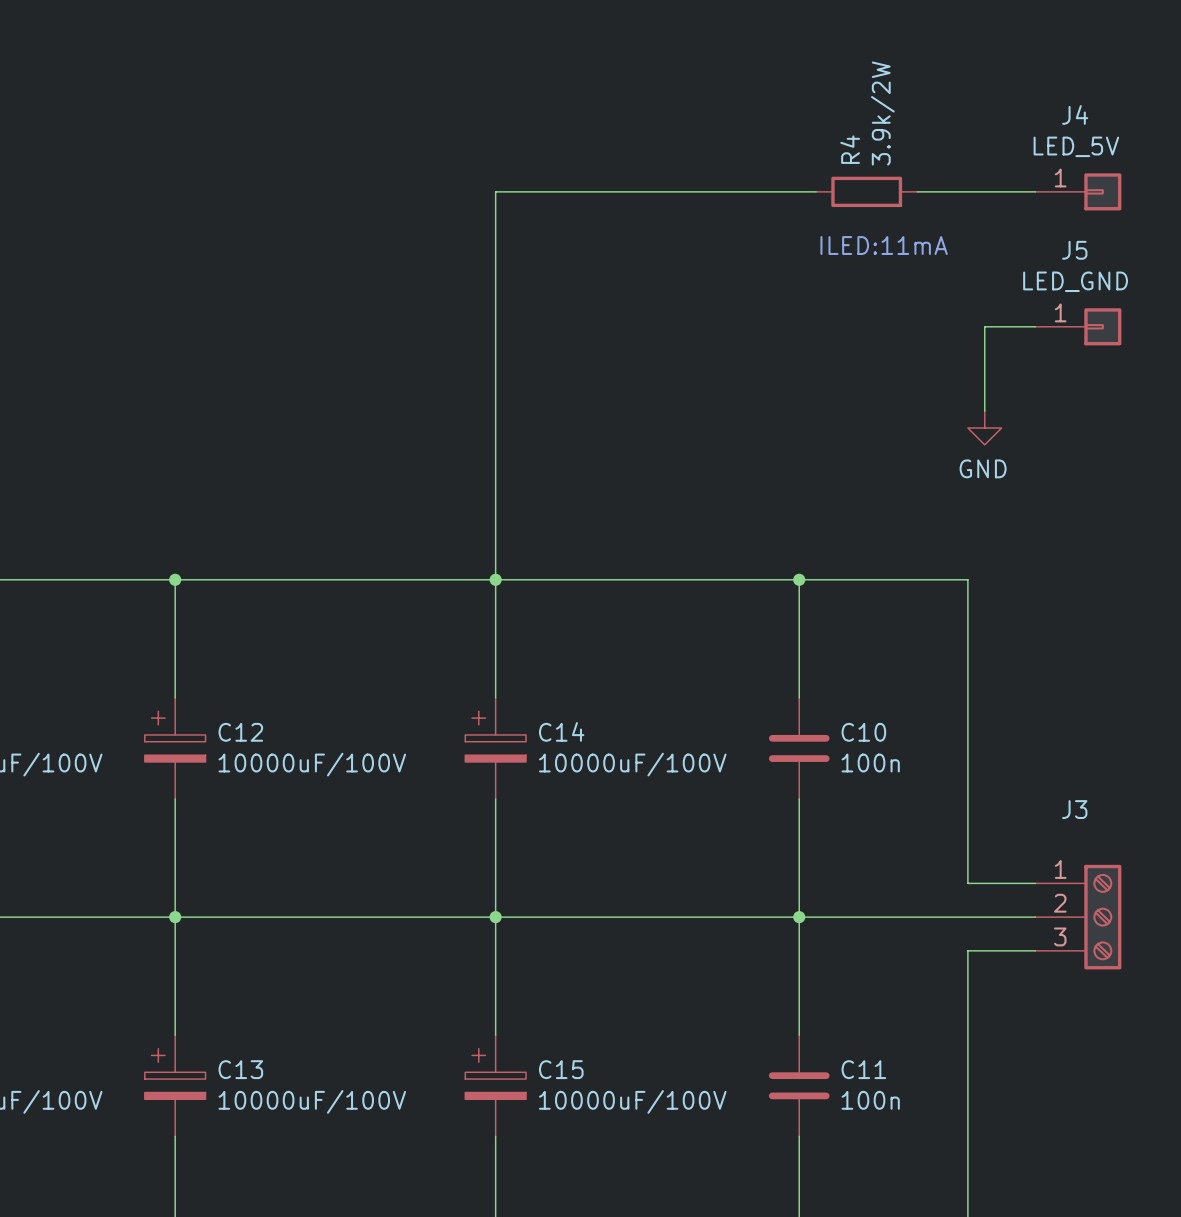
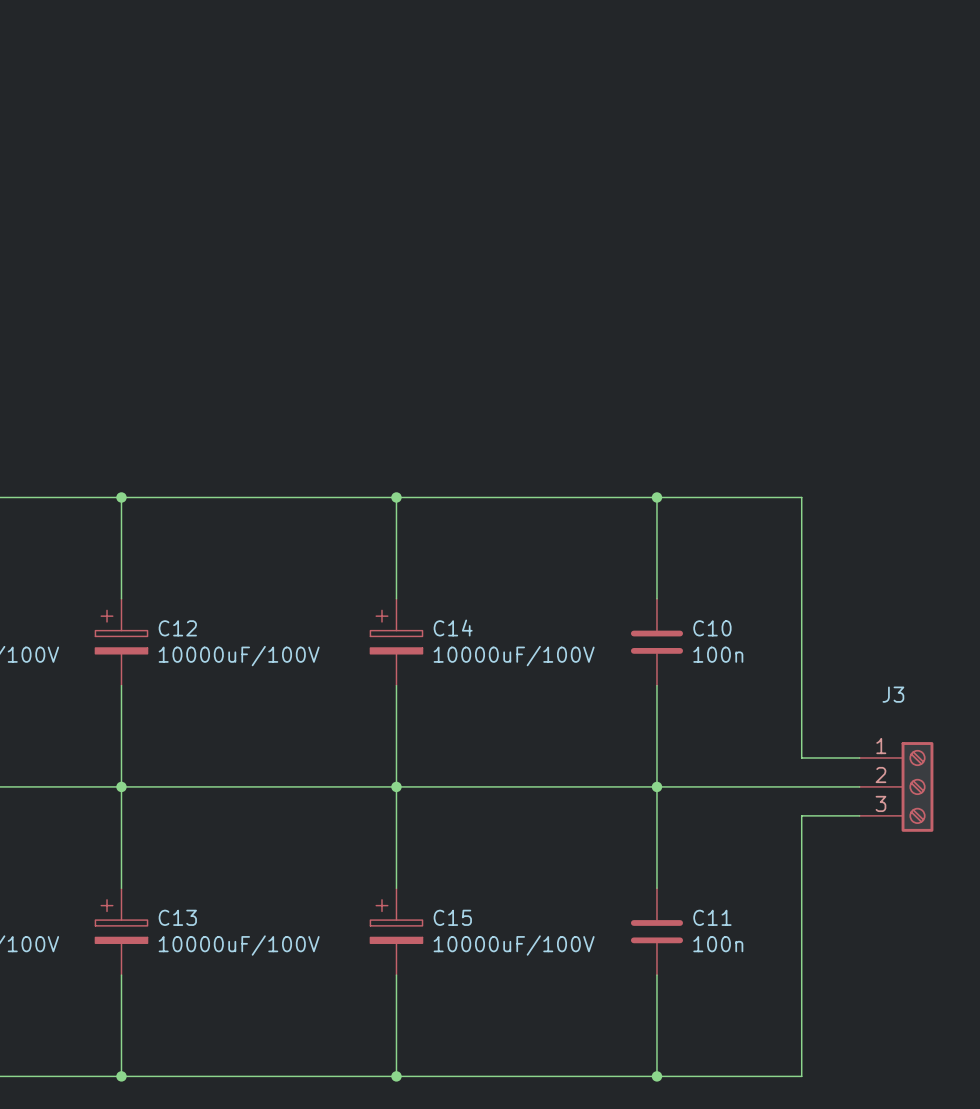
wire: (816, 191) (495, 191) (495, 579) -> none
R4: 3.9k/2W (866, 191) -> none
wire: (917, 191) (1035, 191) -> none
J4: LED_5V (1078, 191) -> none
text: ILED:11mA (884, 245) -> none
wire: (1035, 326) (984, 326) (984, 411) -> none
J5: LED_GND (1078, 326) -> none
power symbol: GND (984, 428) -> none

